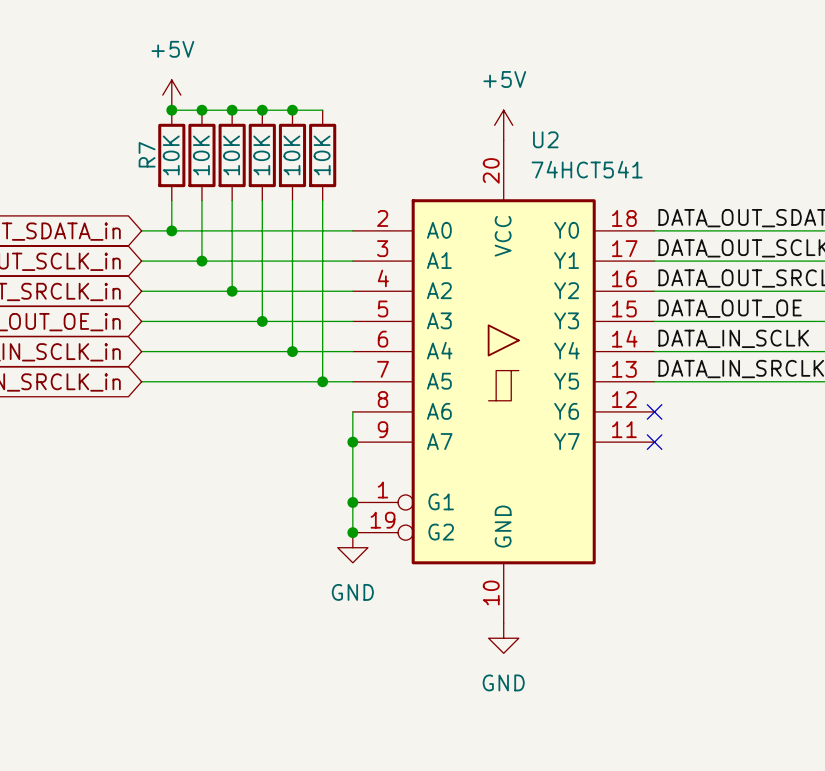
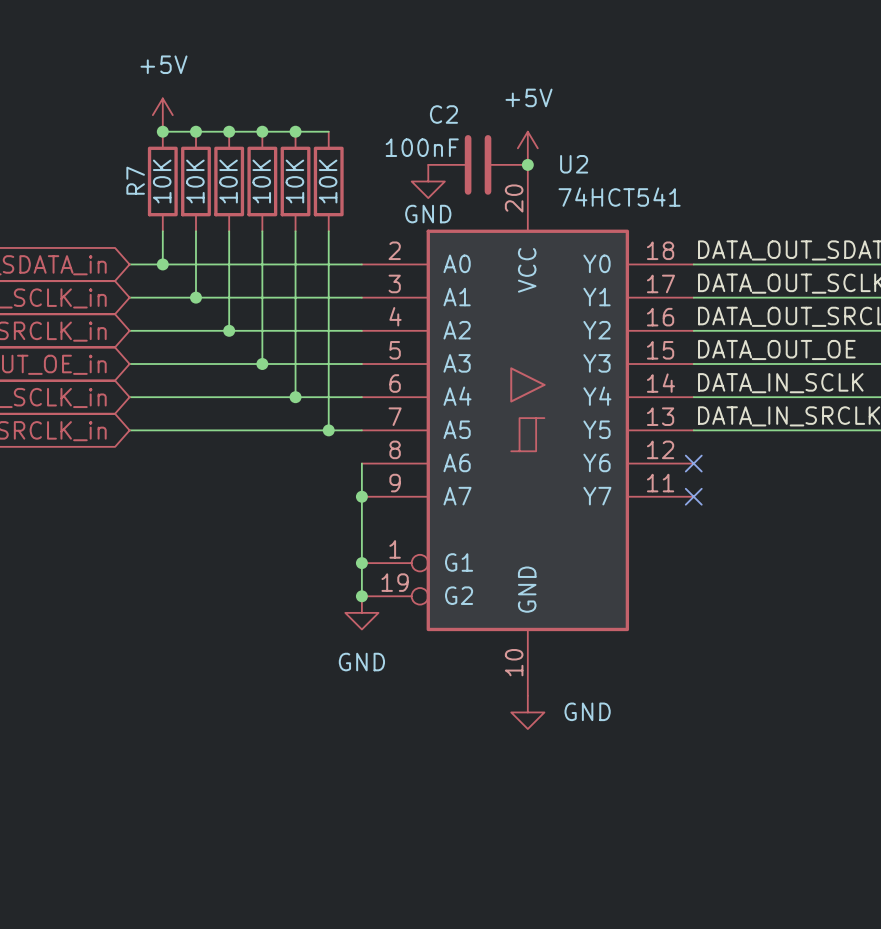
C2: none -> 100nF (478, 164)
junction: none -> (527, 164)
power symbol: none -> GND (428, 181)
power symbol text position: GND (503, 682) -> GND (587, 711)

